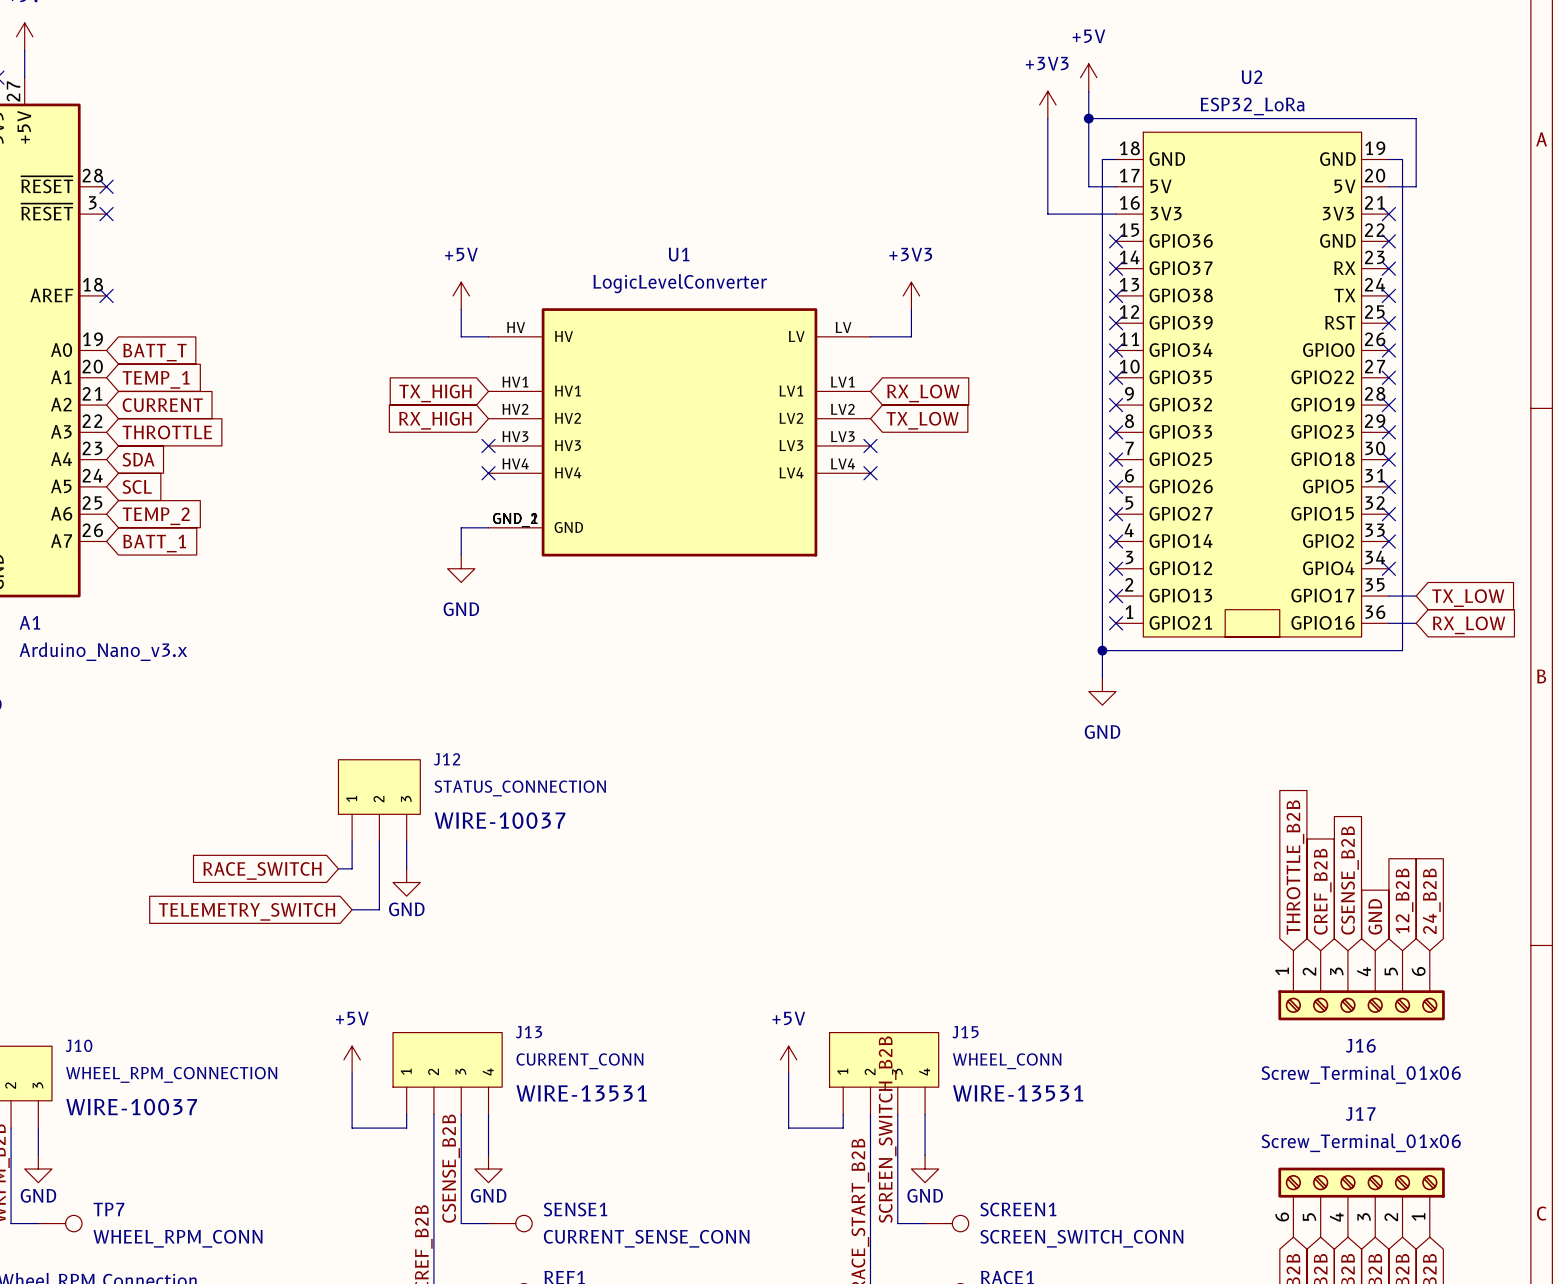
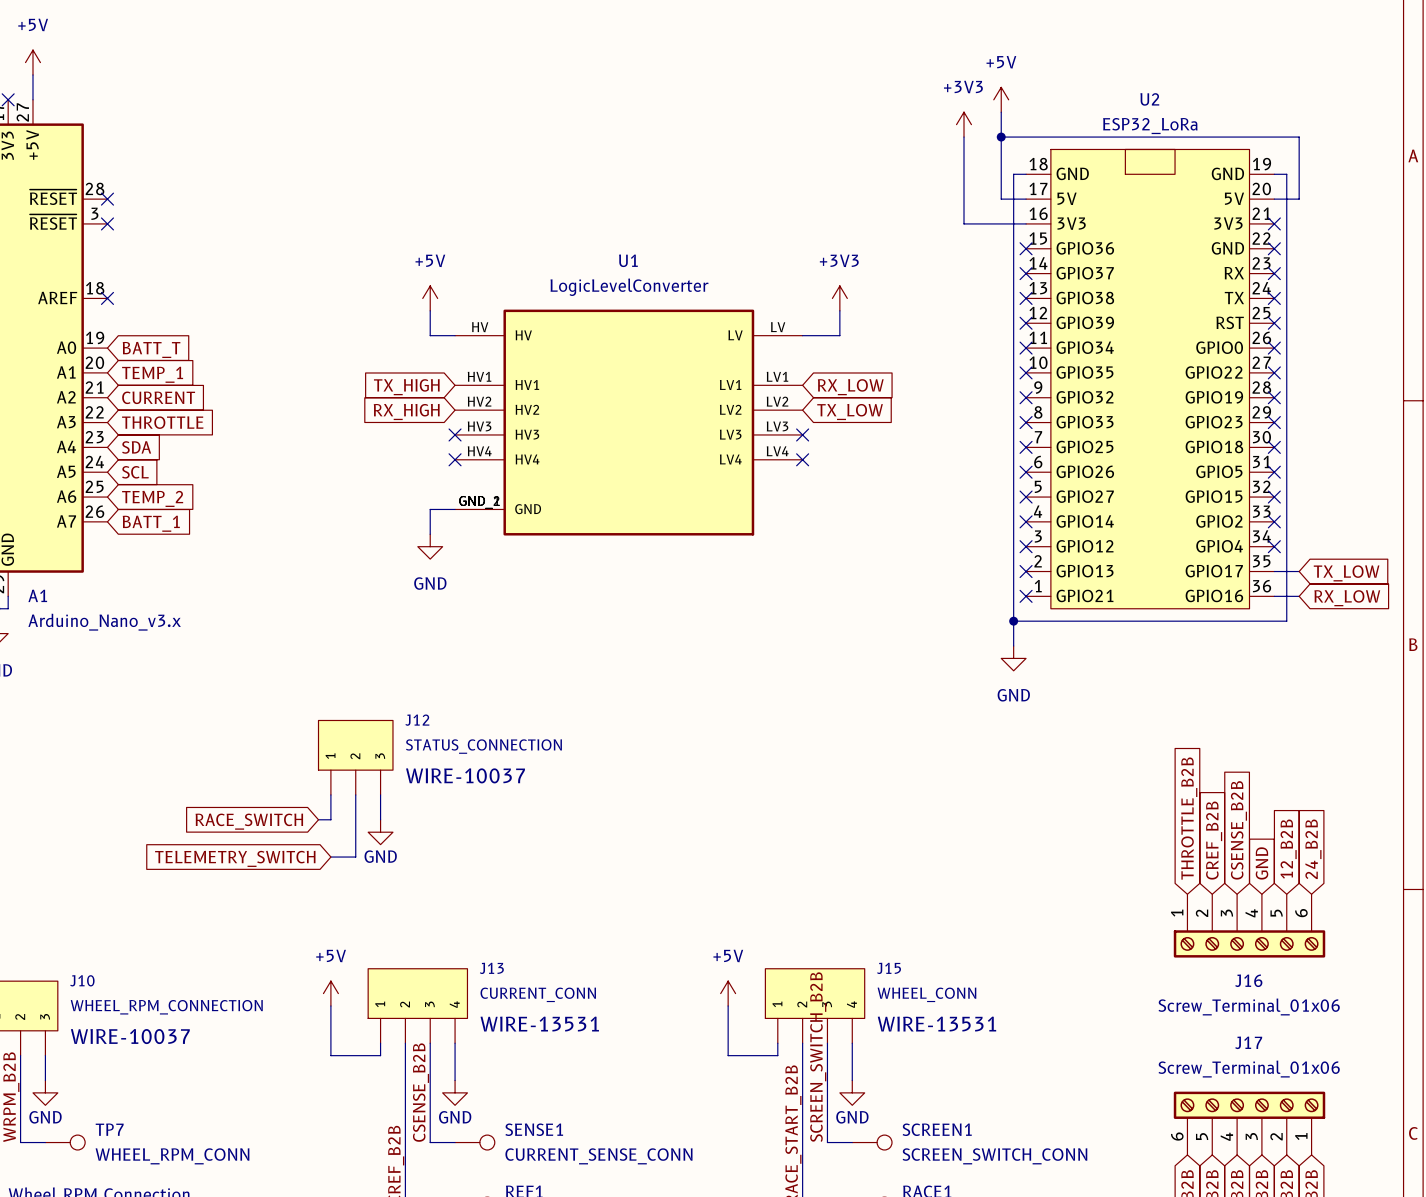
U2 symbol: [1116, 132, 1389, 637] -> [1026, 149, 1275, 609]

